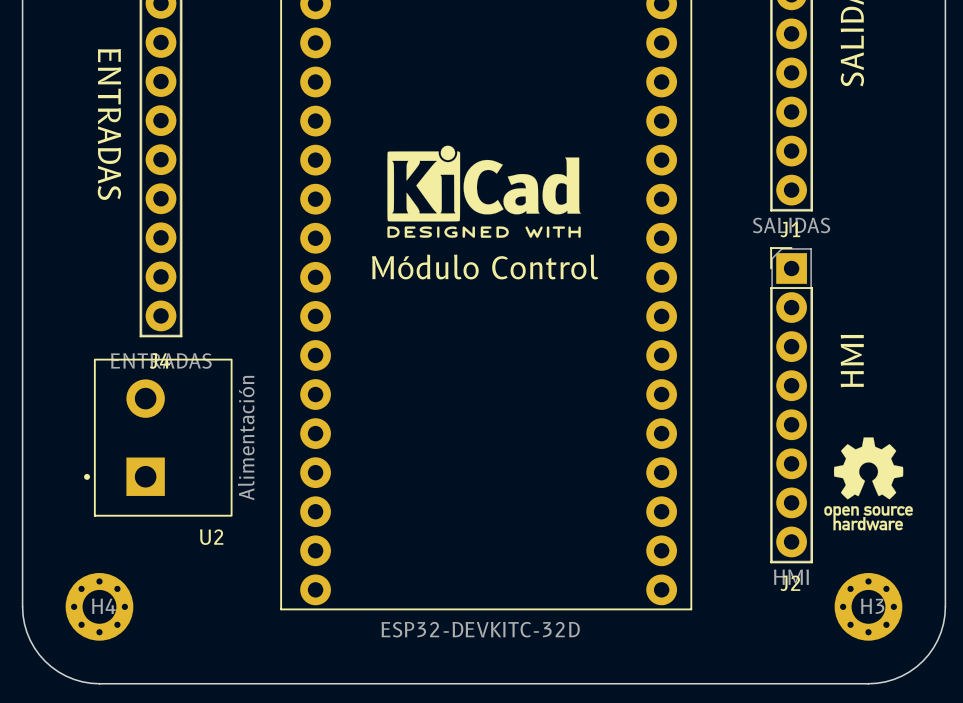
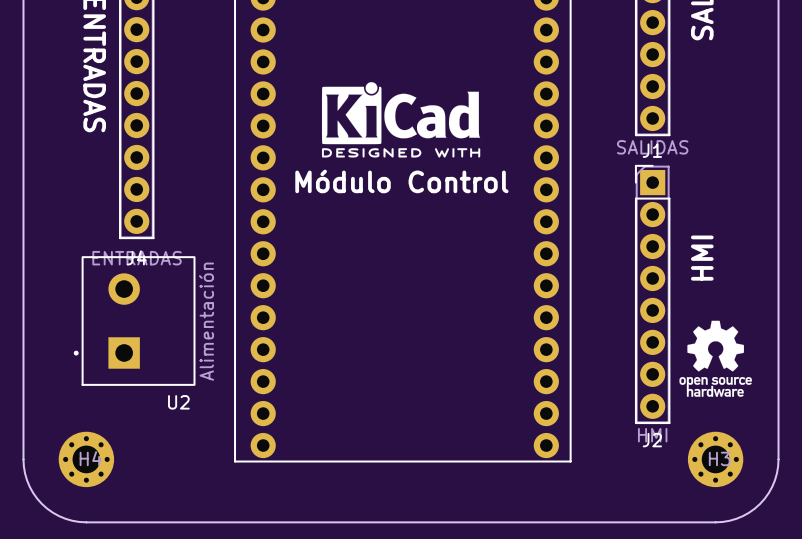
part value: ESP32-DEVKITC-32D (480, 629) -> none

